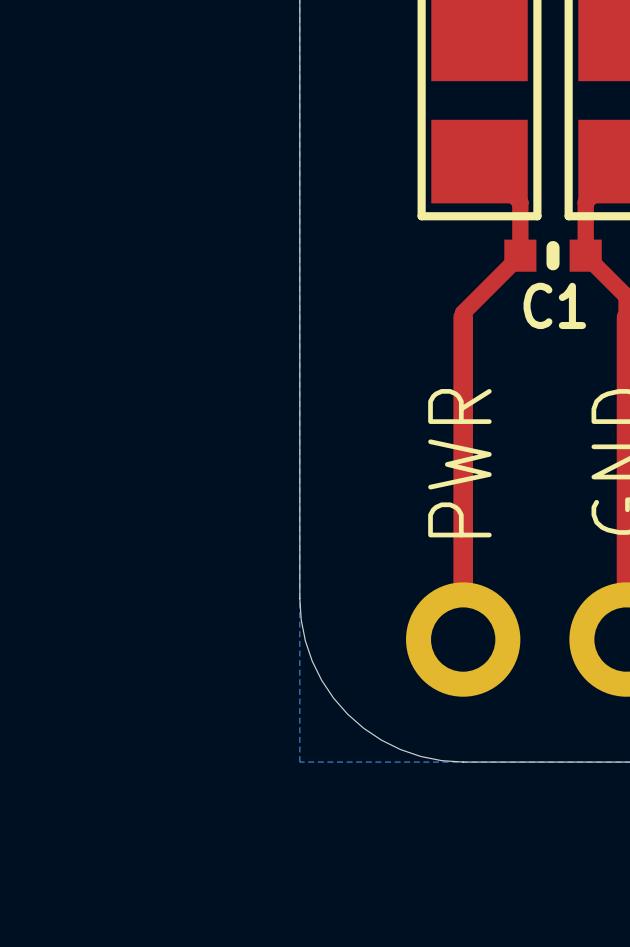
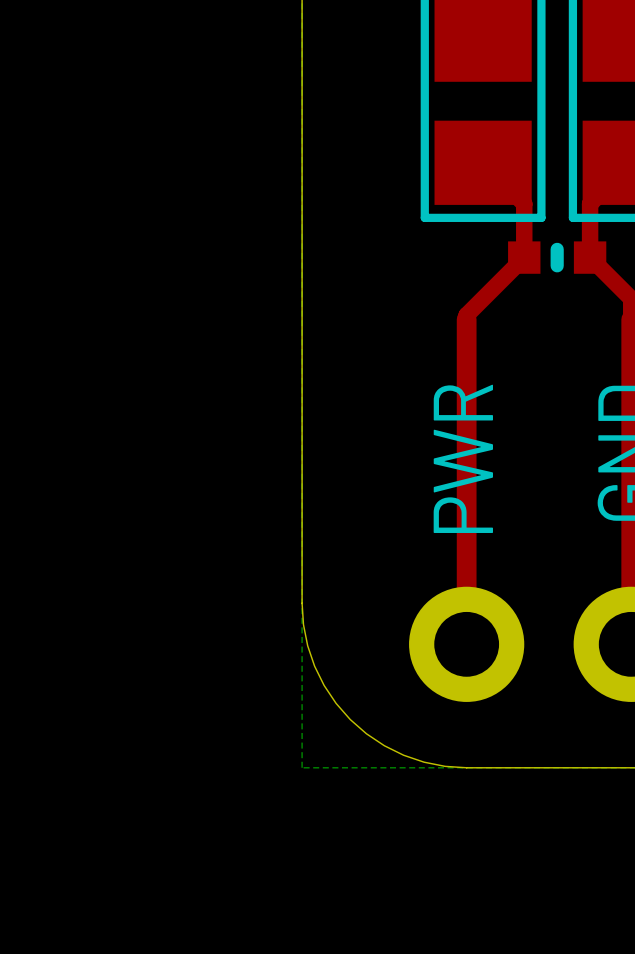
C1 name: C1 (554, 305) -> none

